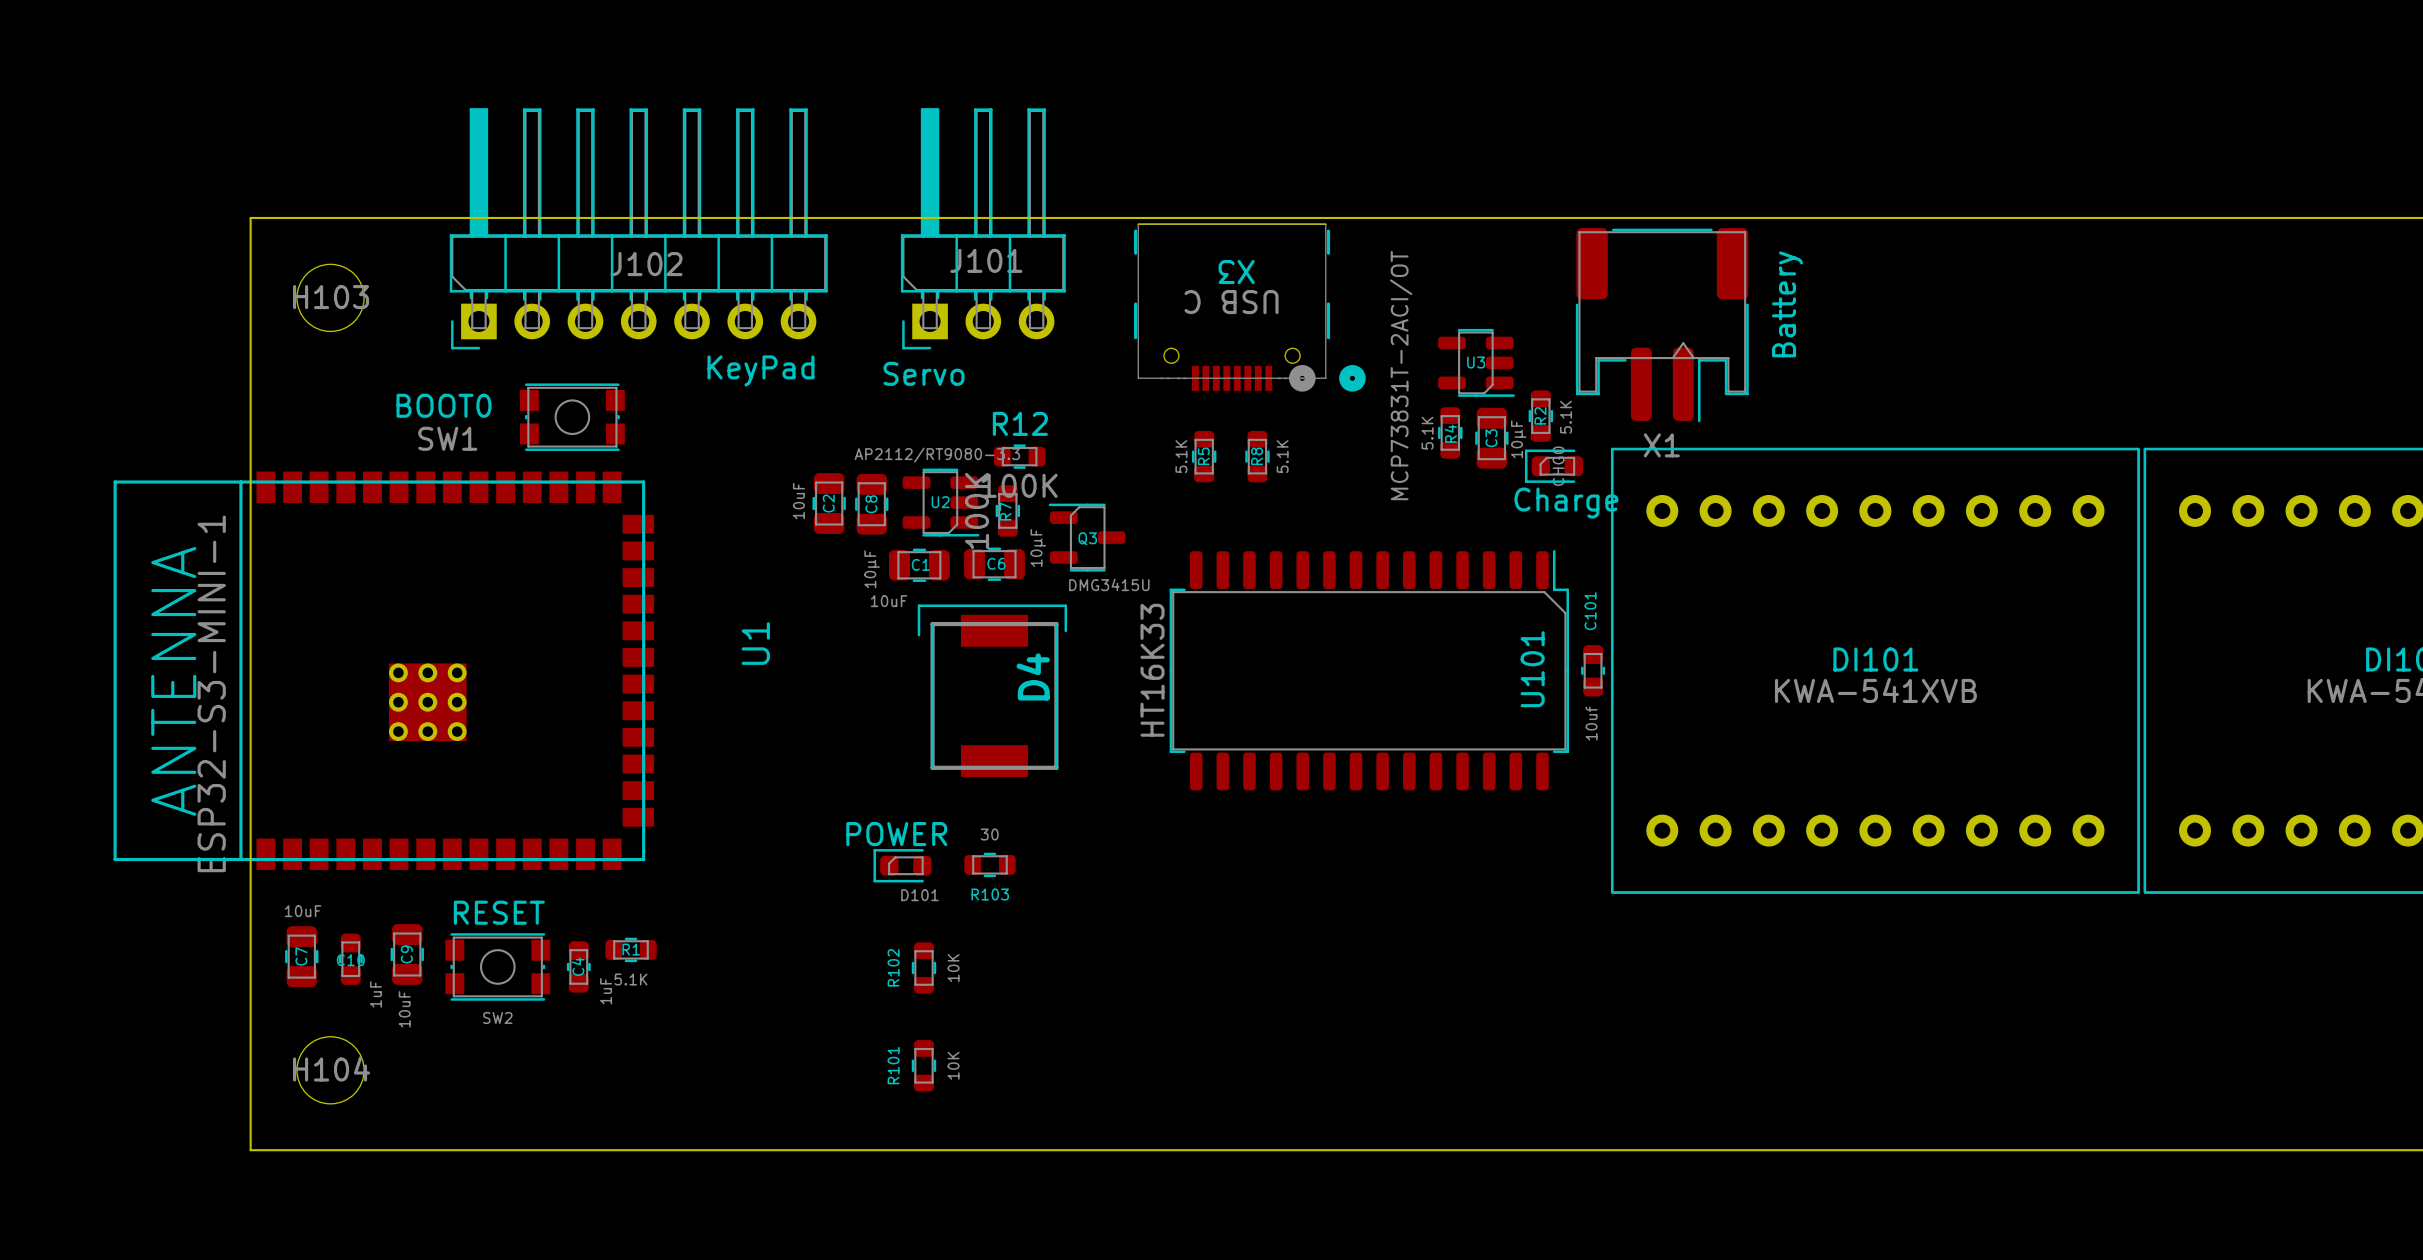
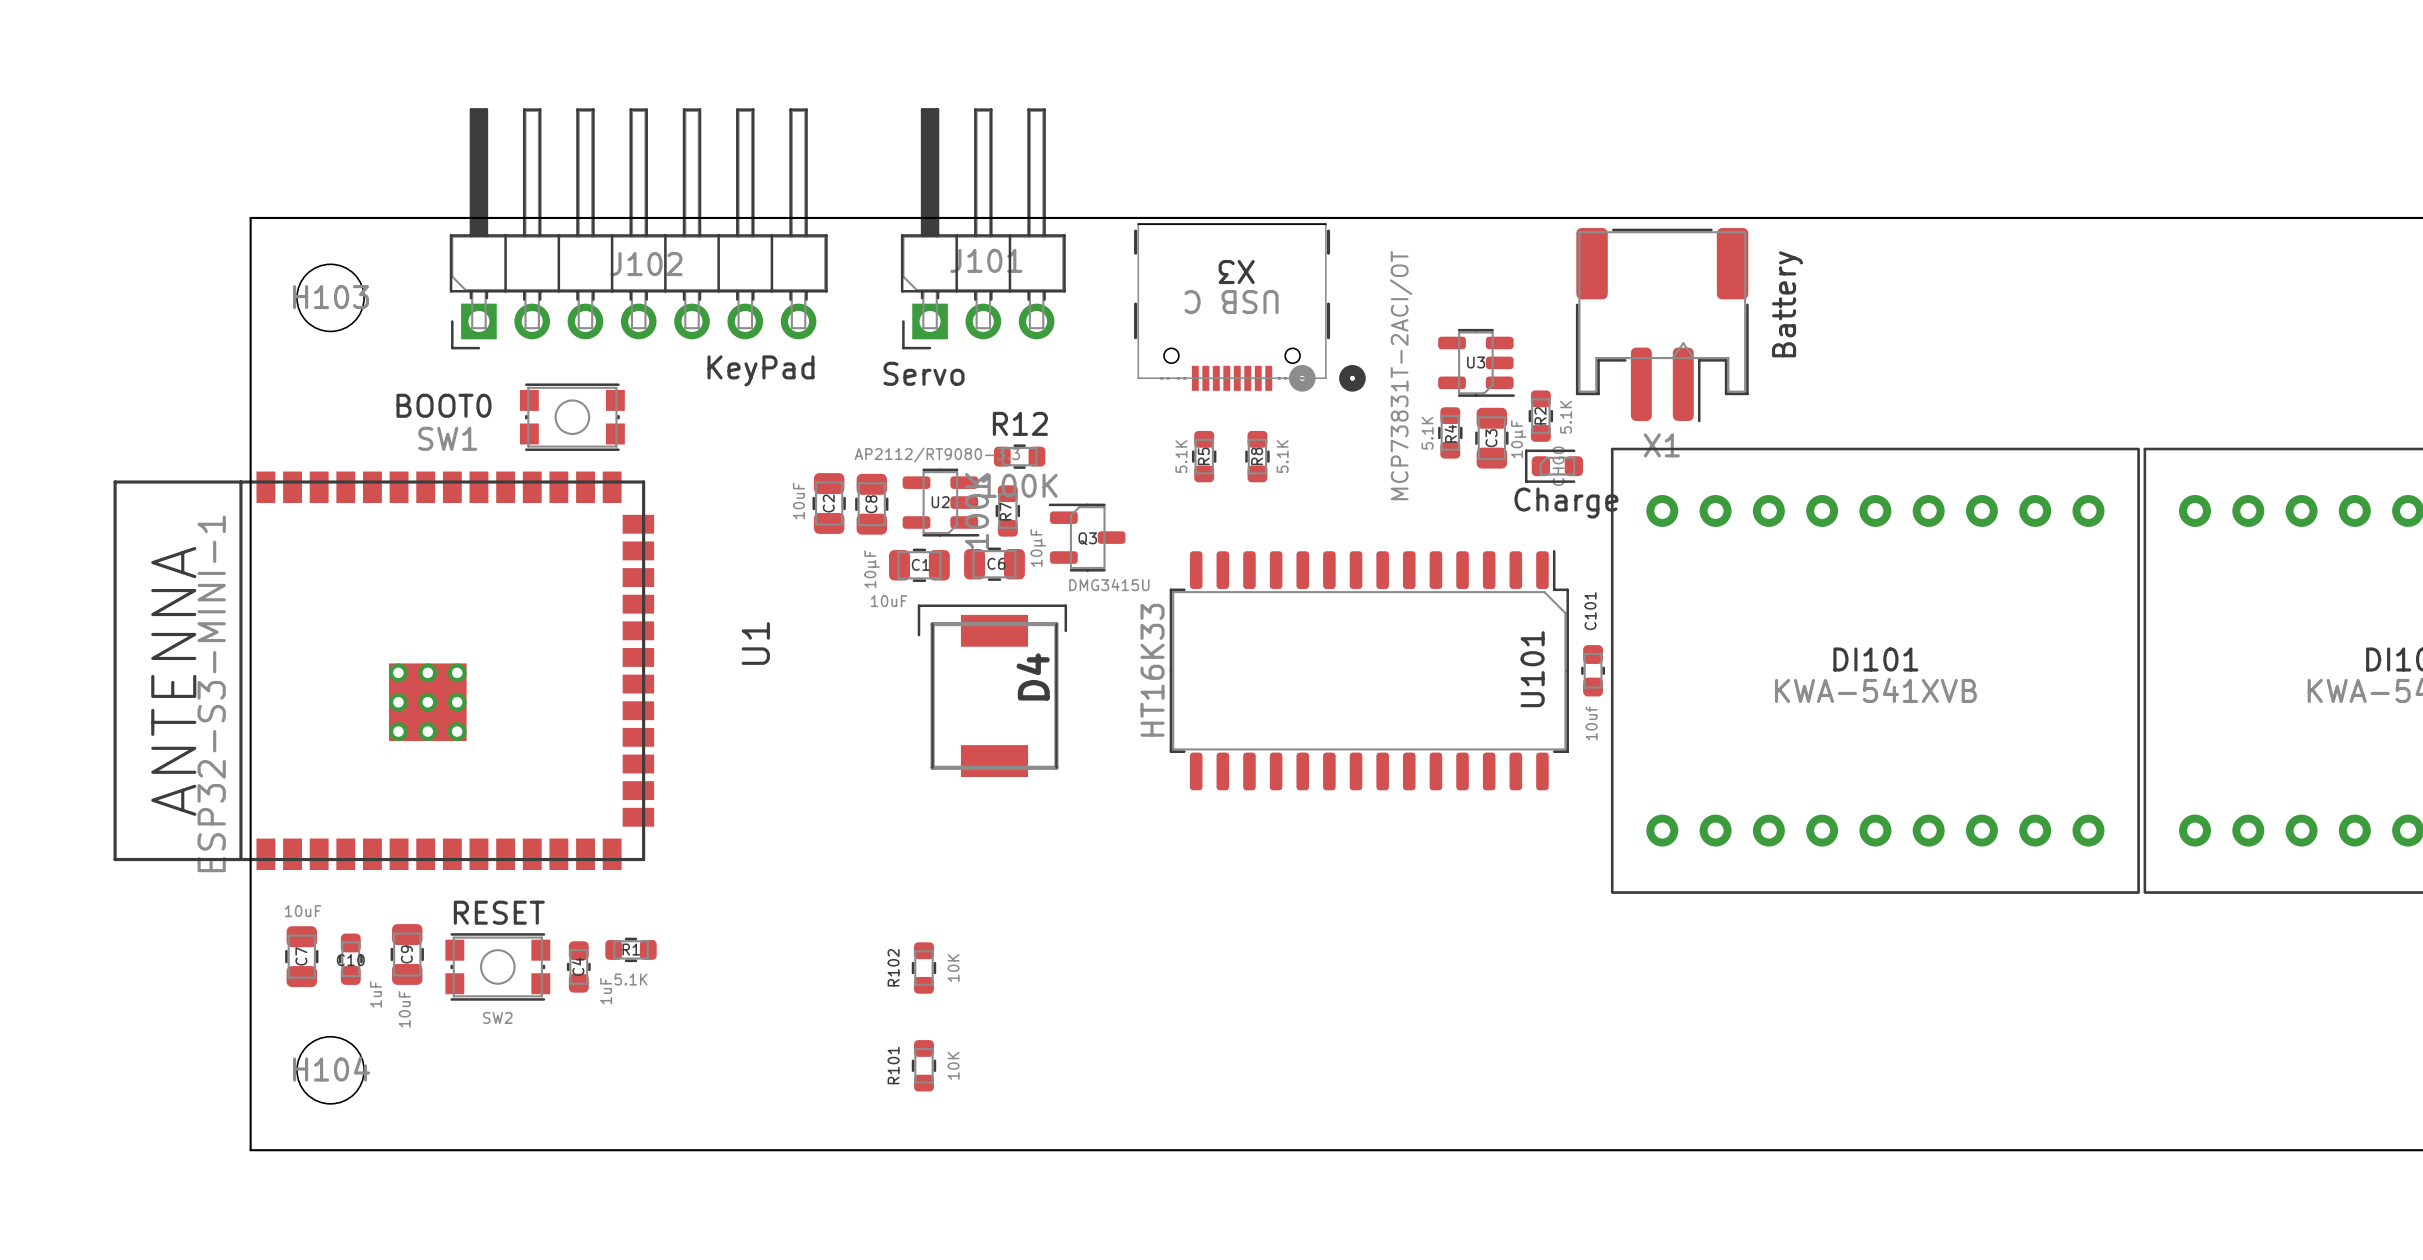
R103: 30 (989, 864) -> none
D101: POWER (902, 865) -> none

